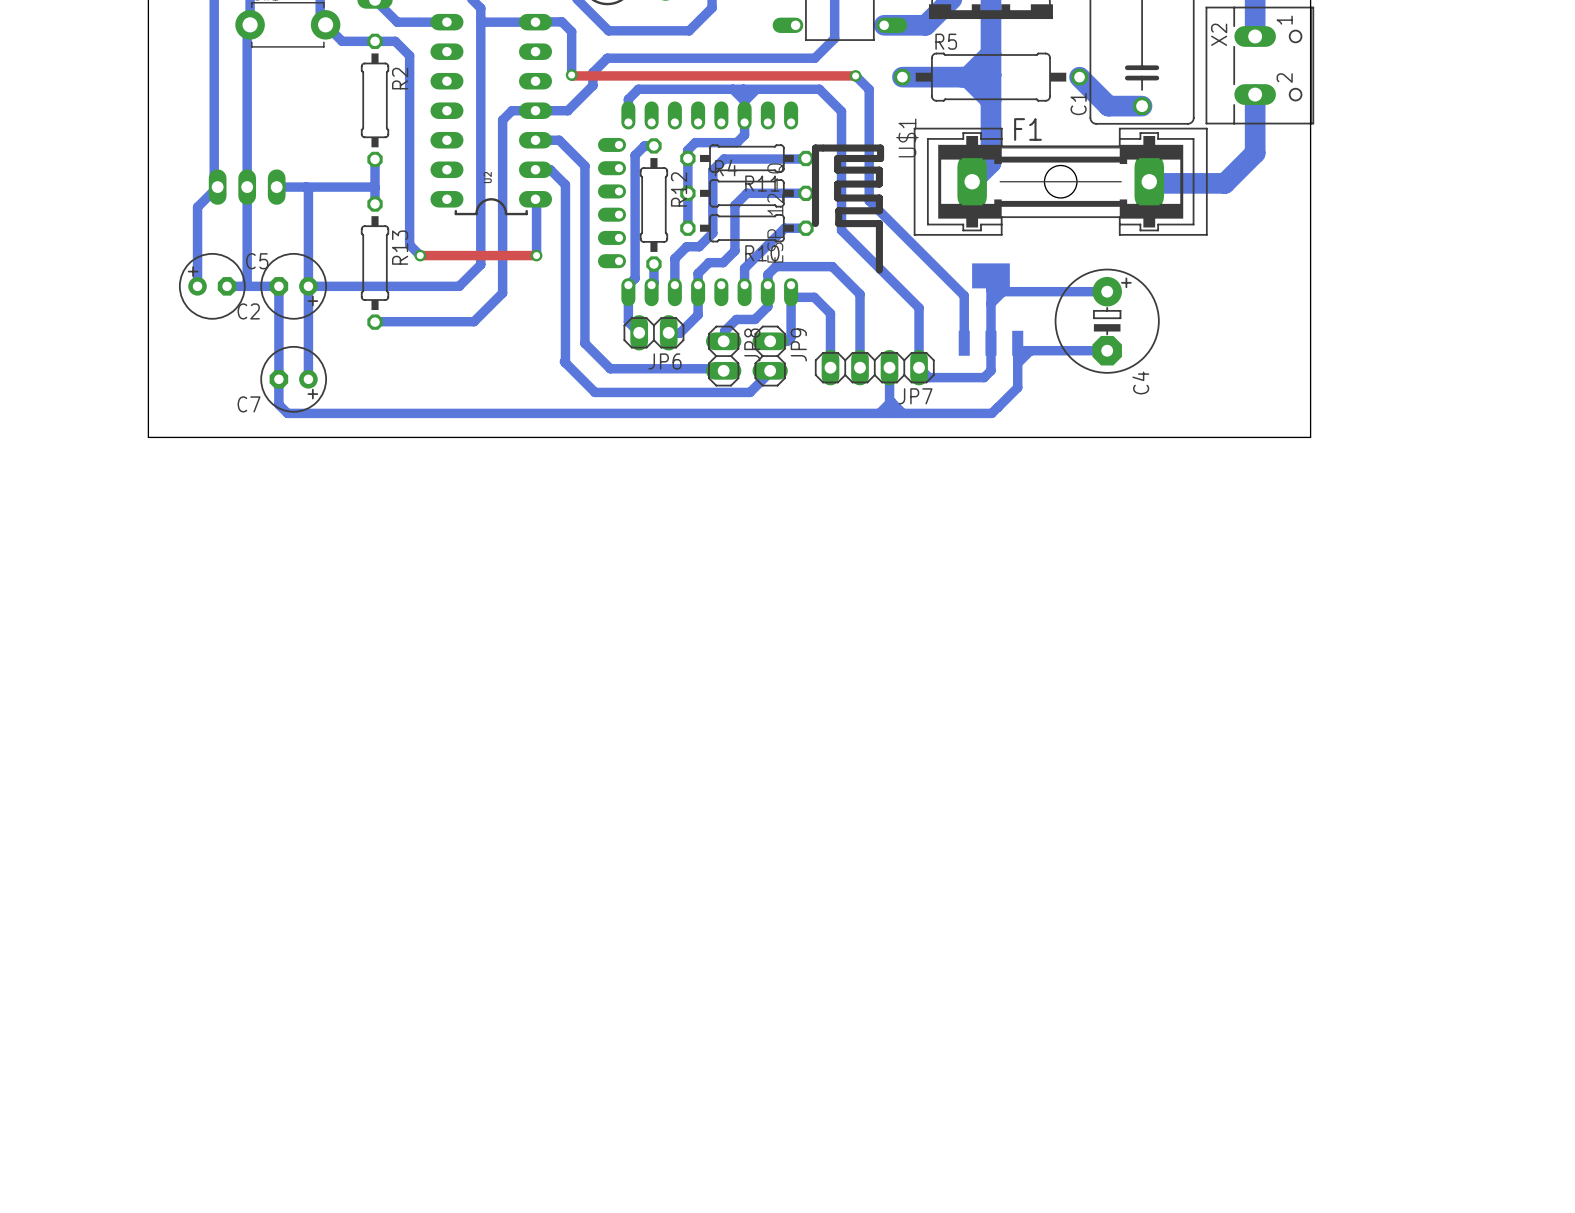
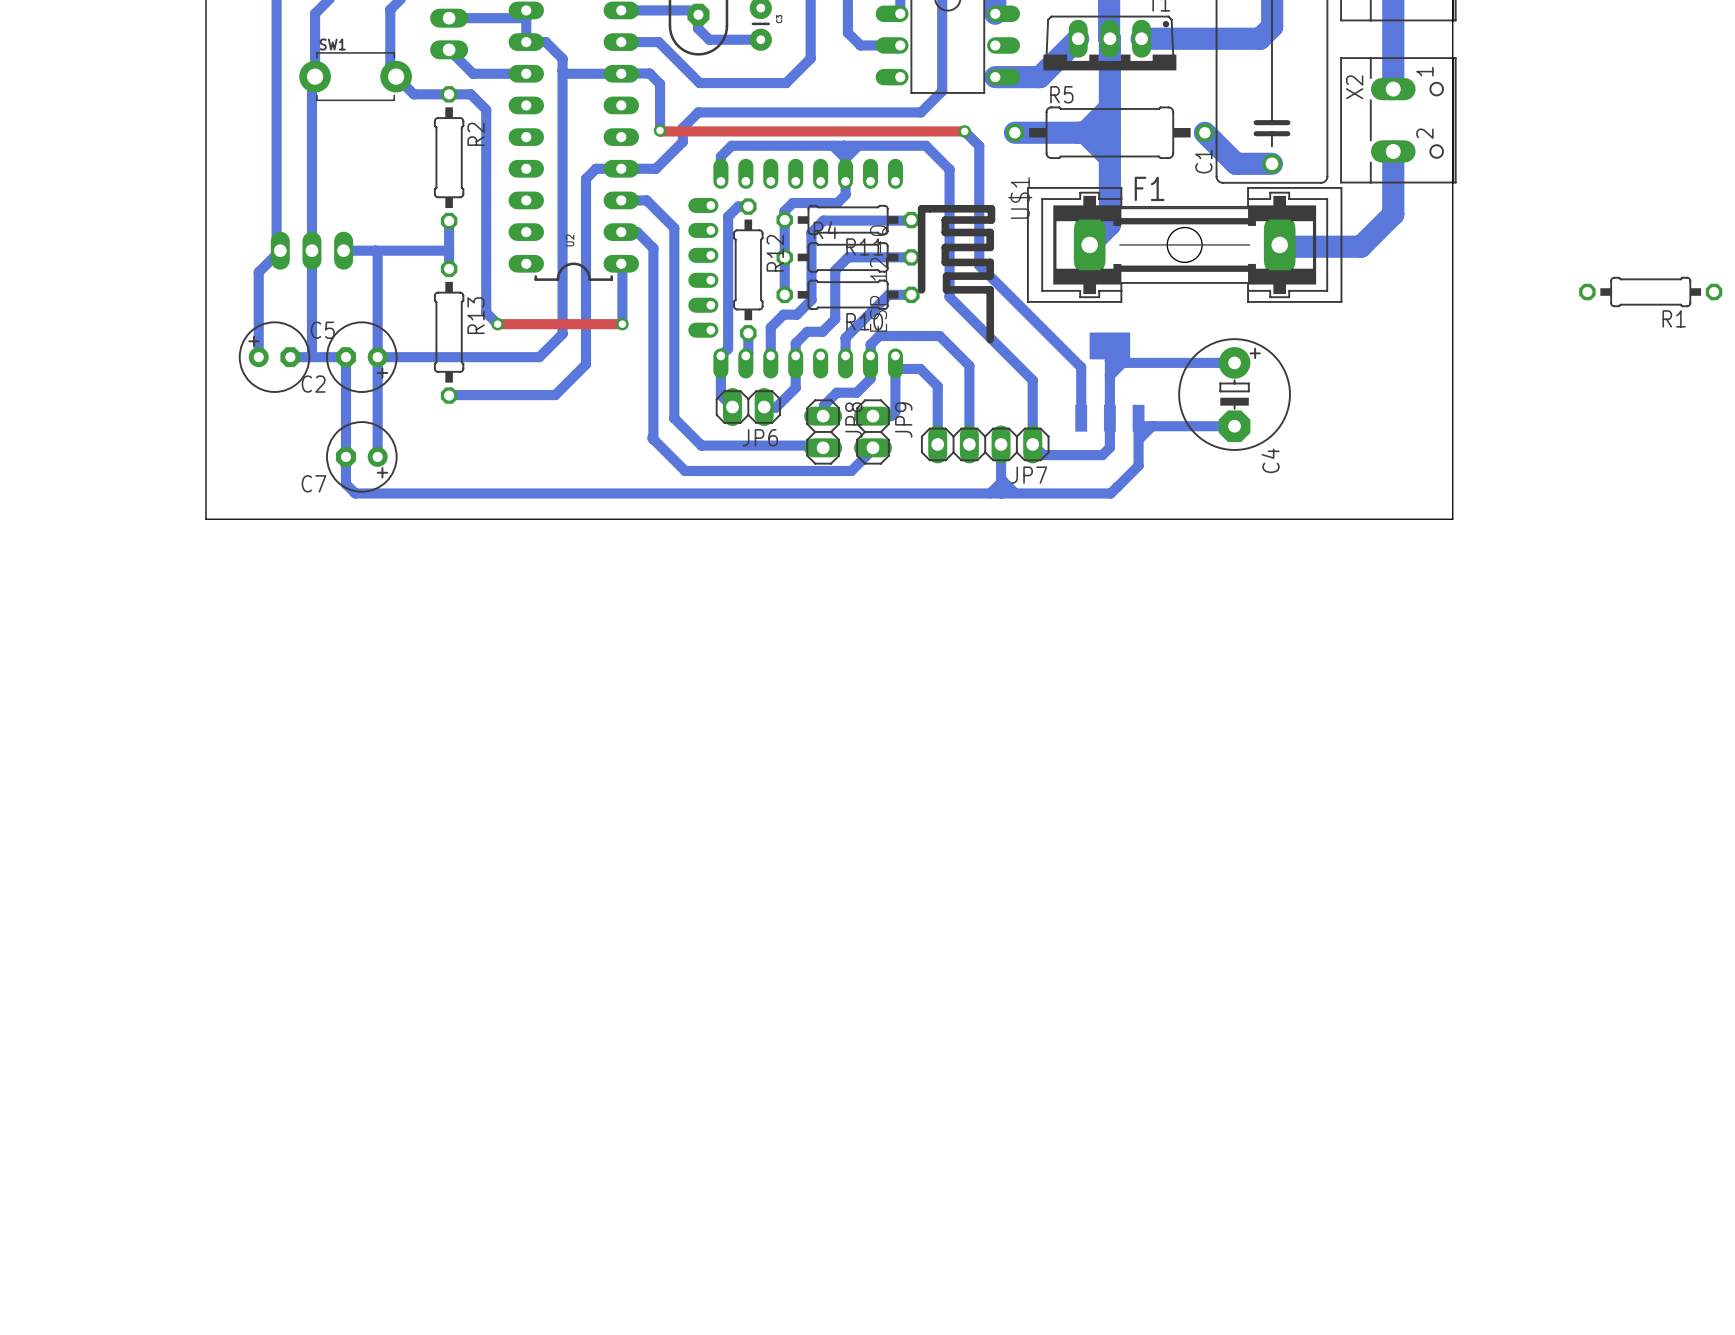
R1: none -> (1650, 292)

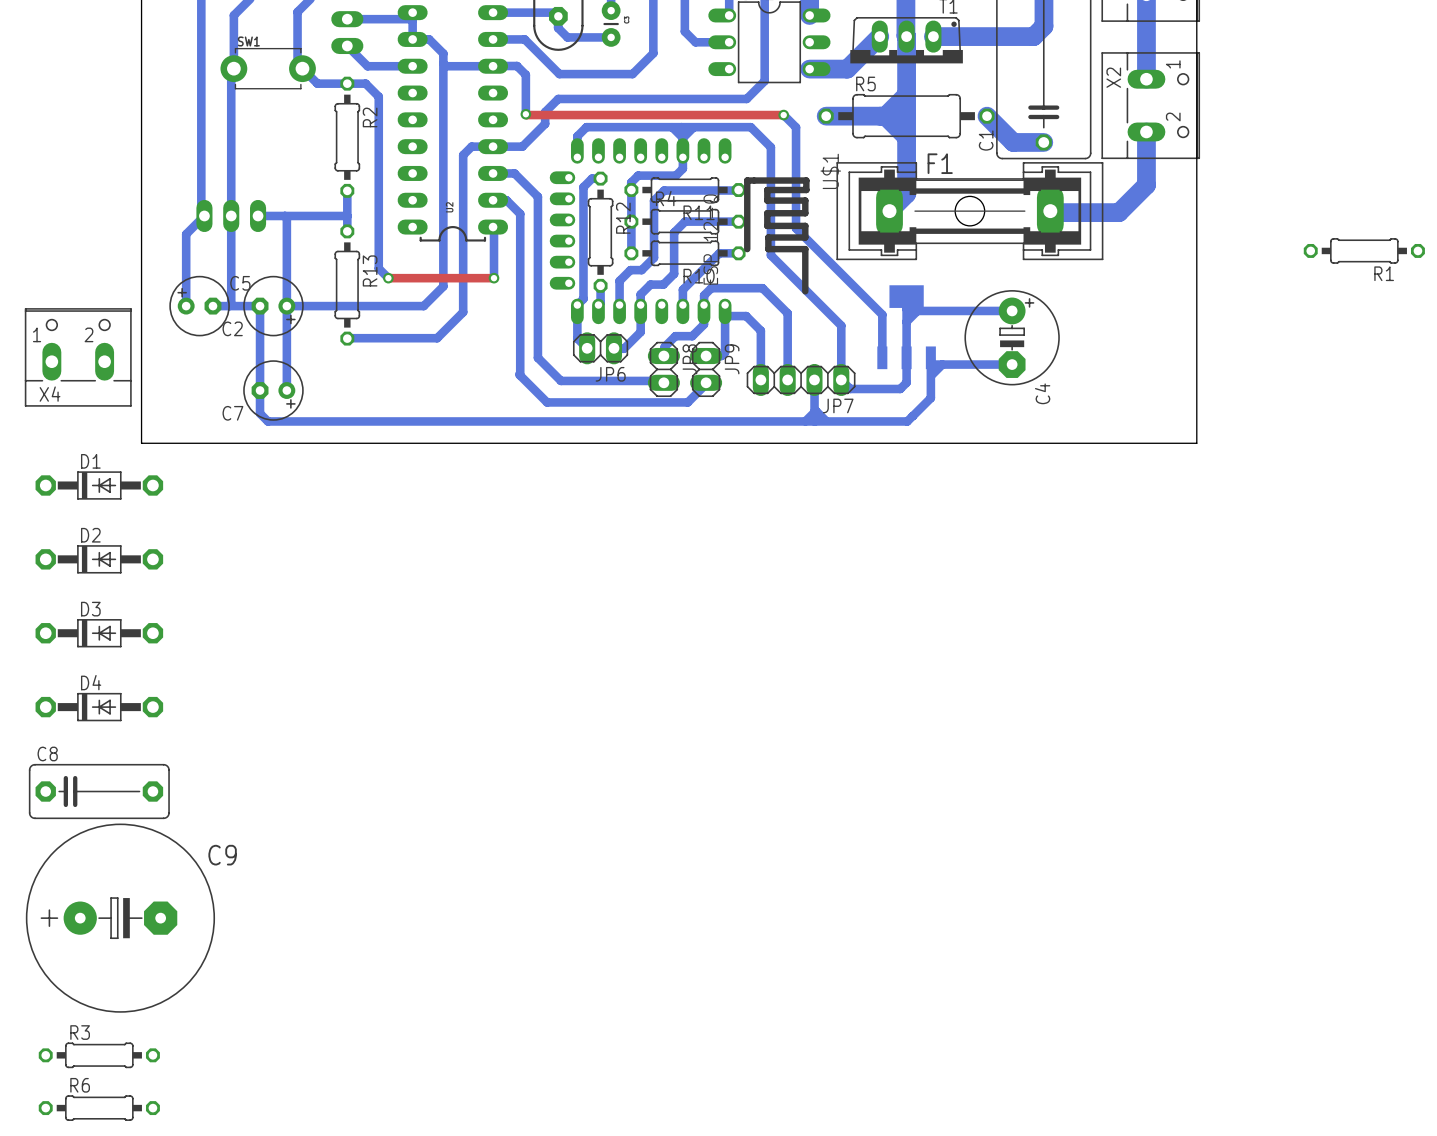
X4: none -> (78, 357)
D1: none -> (99, 485)
D2: none -> (99, 559)
D3: none -> (99, 633)
D4: none -> (99, 707)
C8: none -> (99, 791)
C9: none -> (120, 918)
R3: none -> (99, 1055)
R6: none -> (99, 1108)

